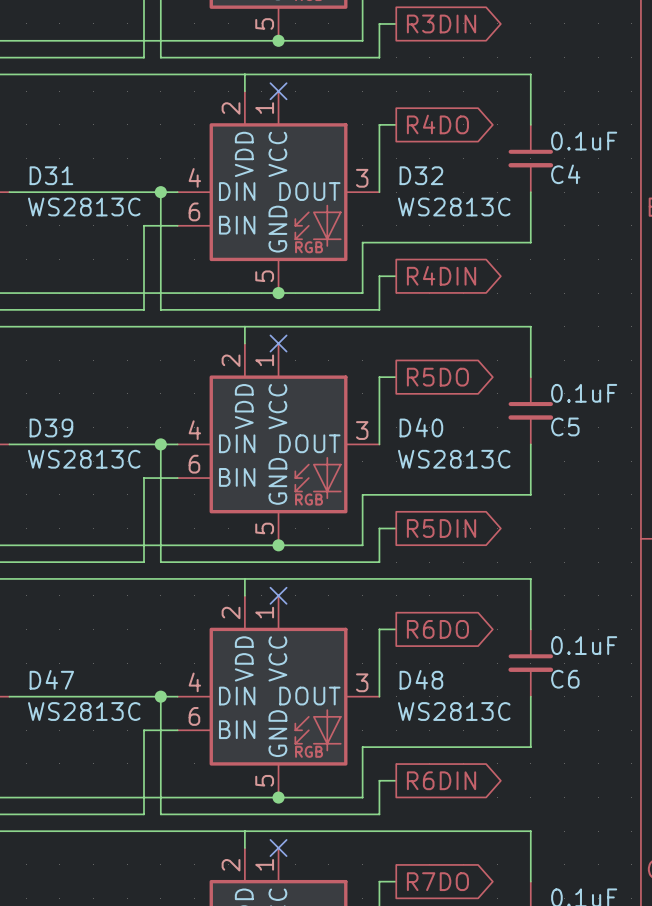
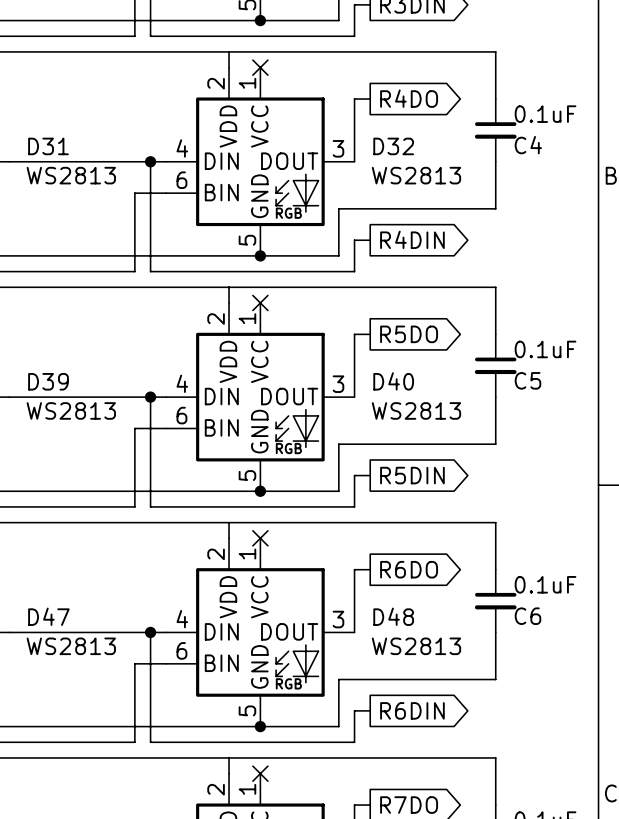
D31 value: WS2813C (84, 207) -> WS2813 (71, 175)
D32 value: WS2813C (454, 207) -> WS2813 (416, 175)
D39 value: WS2813C (84, 459) -> WS2813 (71, 410)
D40 value: WS2813C (454, 459) -> WS2813 (416, 410)
D47 value: WS2813C (84, 711) -> WS2813 (71, 646)
D48 value: WS2813C (454, 711) -> WS2813 (416, 646)

